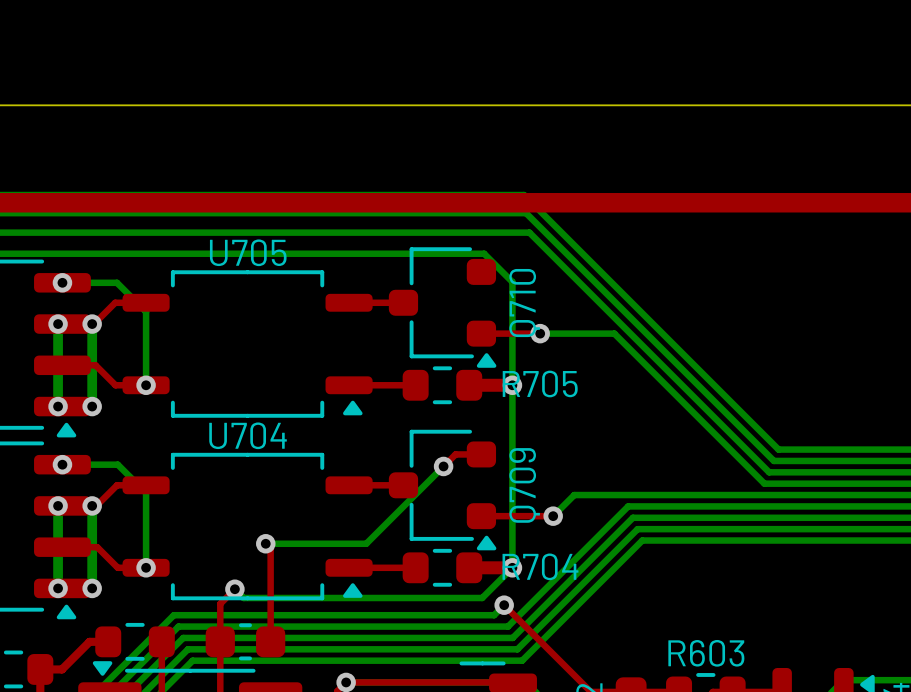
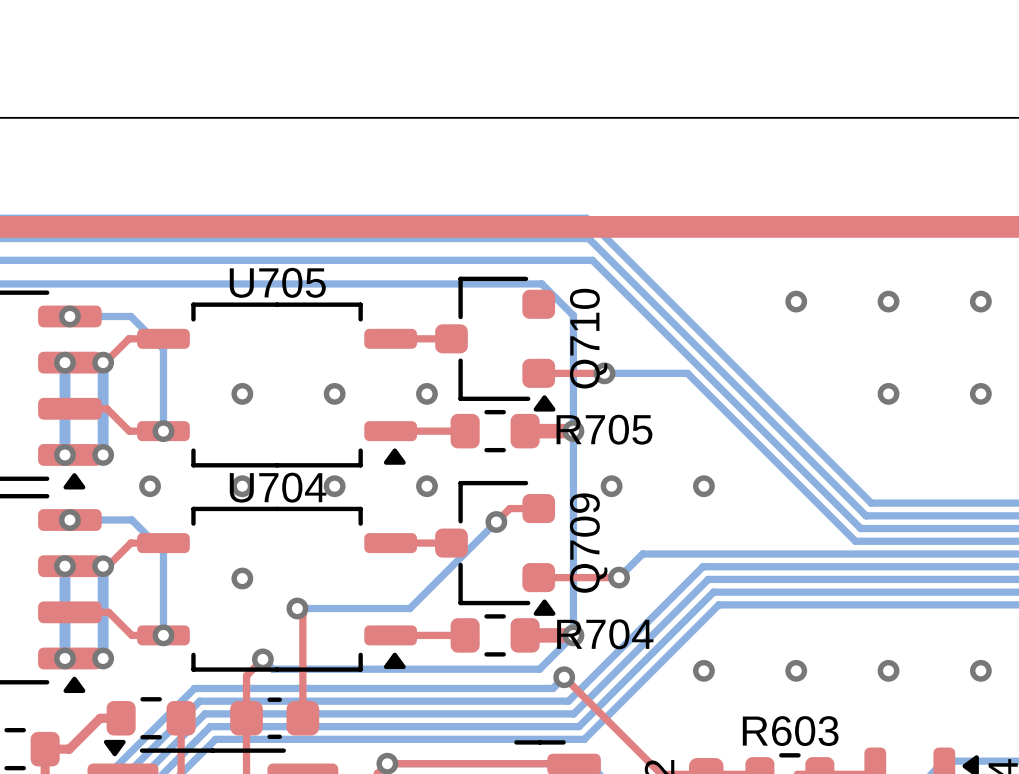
via: none -> (796, 301)
via: none -> (888, 301)
via: none -> (980, 301)
via: none -> (242, 393)
via: none -> (334, 393)
via: none -> (426, 393)
via: none -> (888, 393)
via: none -> (980, 393)
via: none -> (150, 486)
via: none -> (242, 486)
via: none -> (334, 486)
via: none -> (426, 486)
via: none -> (611, 486)
via: none -> (703, 486)
via: none -> (242, 578)
via: none -> (703, 670)
via: none -> (796, 670)
via: none -> (888, 670)
via: none -> (980, 670)

